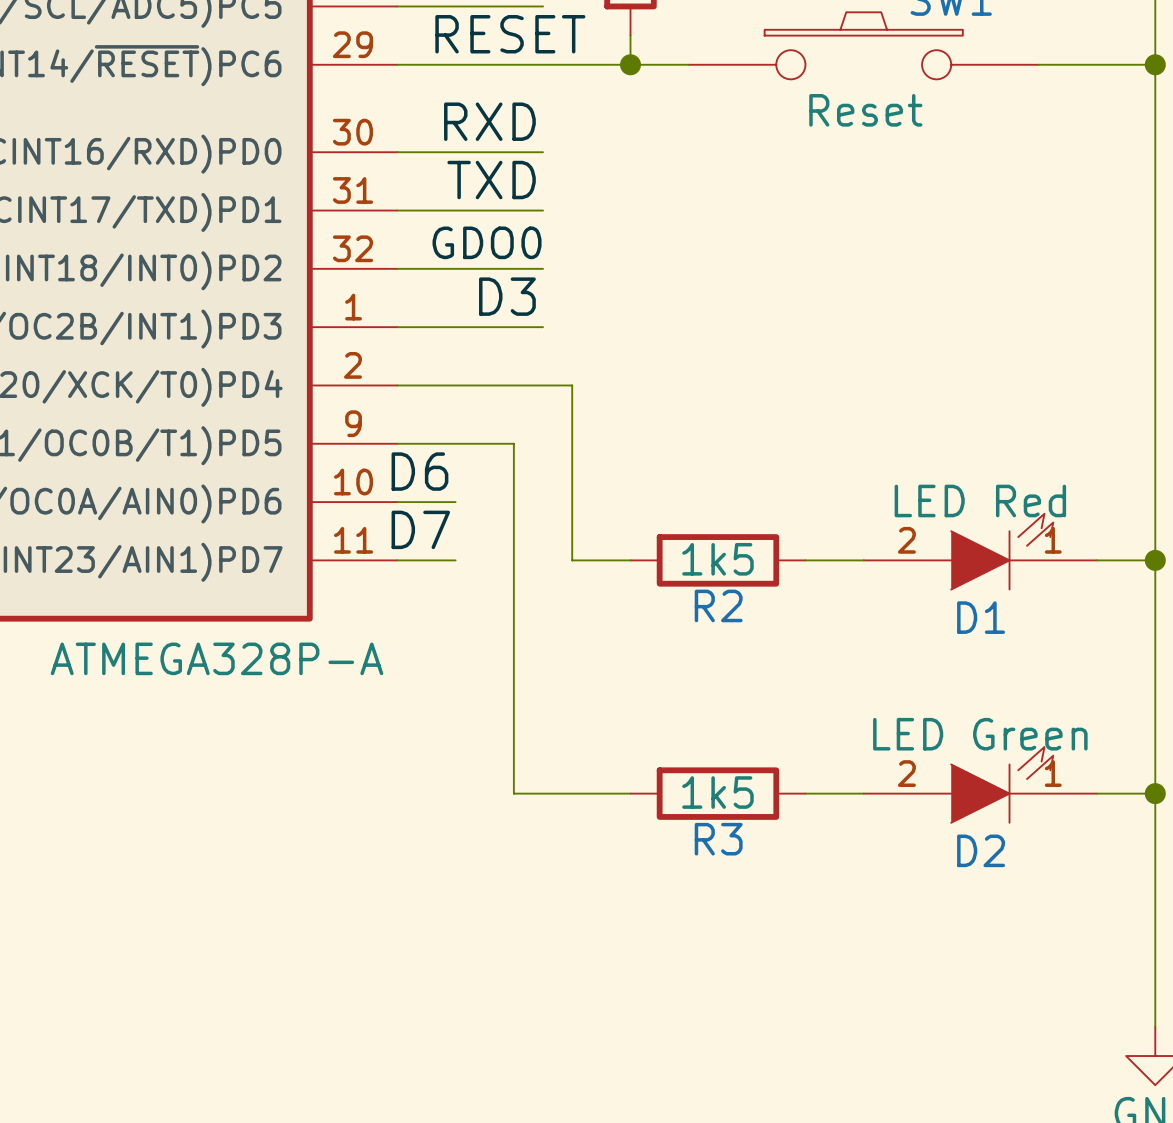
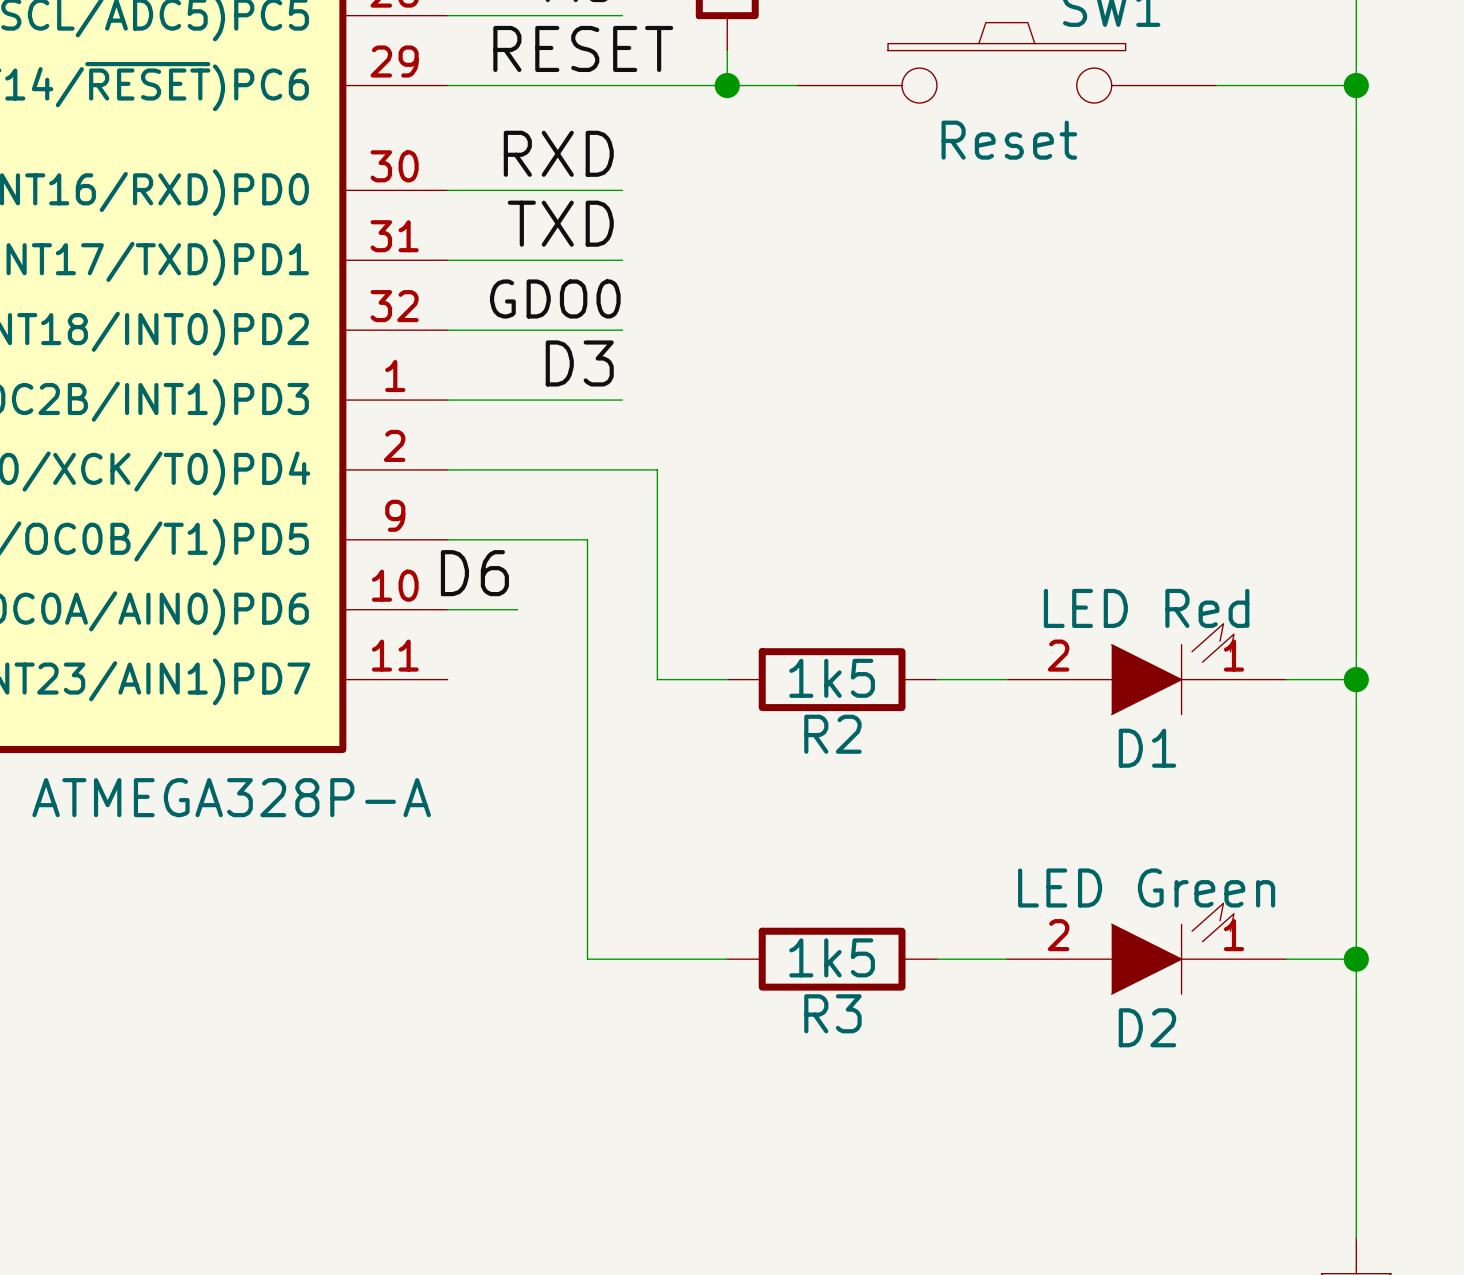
label: D7 (420, 529) -> none
wire: (397, 560) (455, 560) -> none

